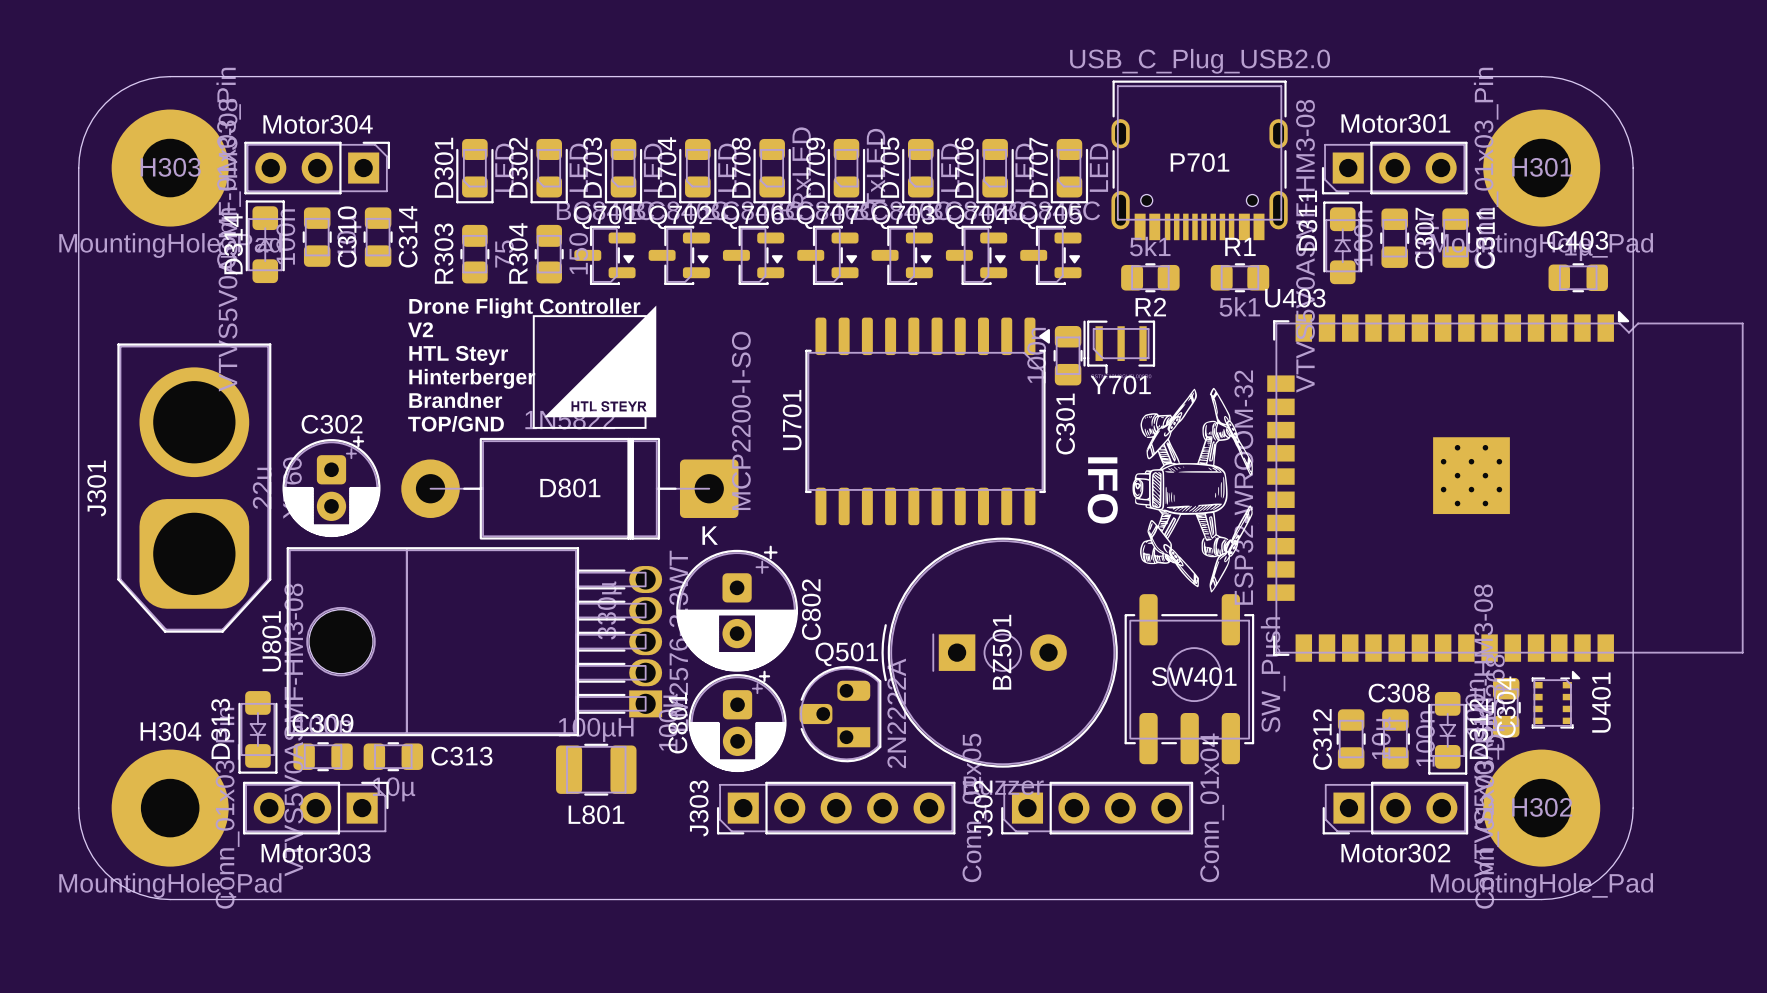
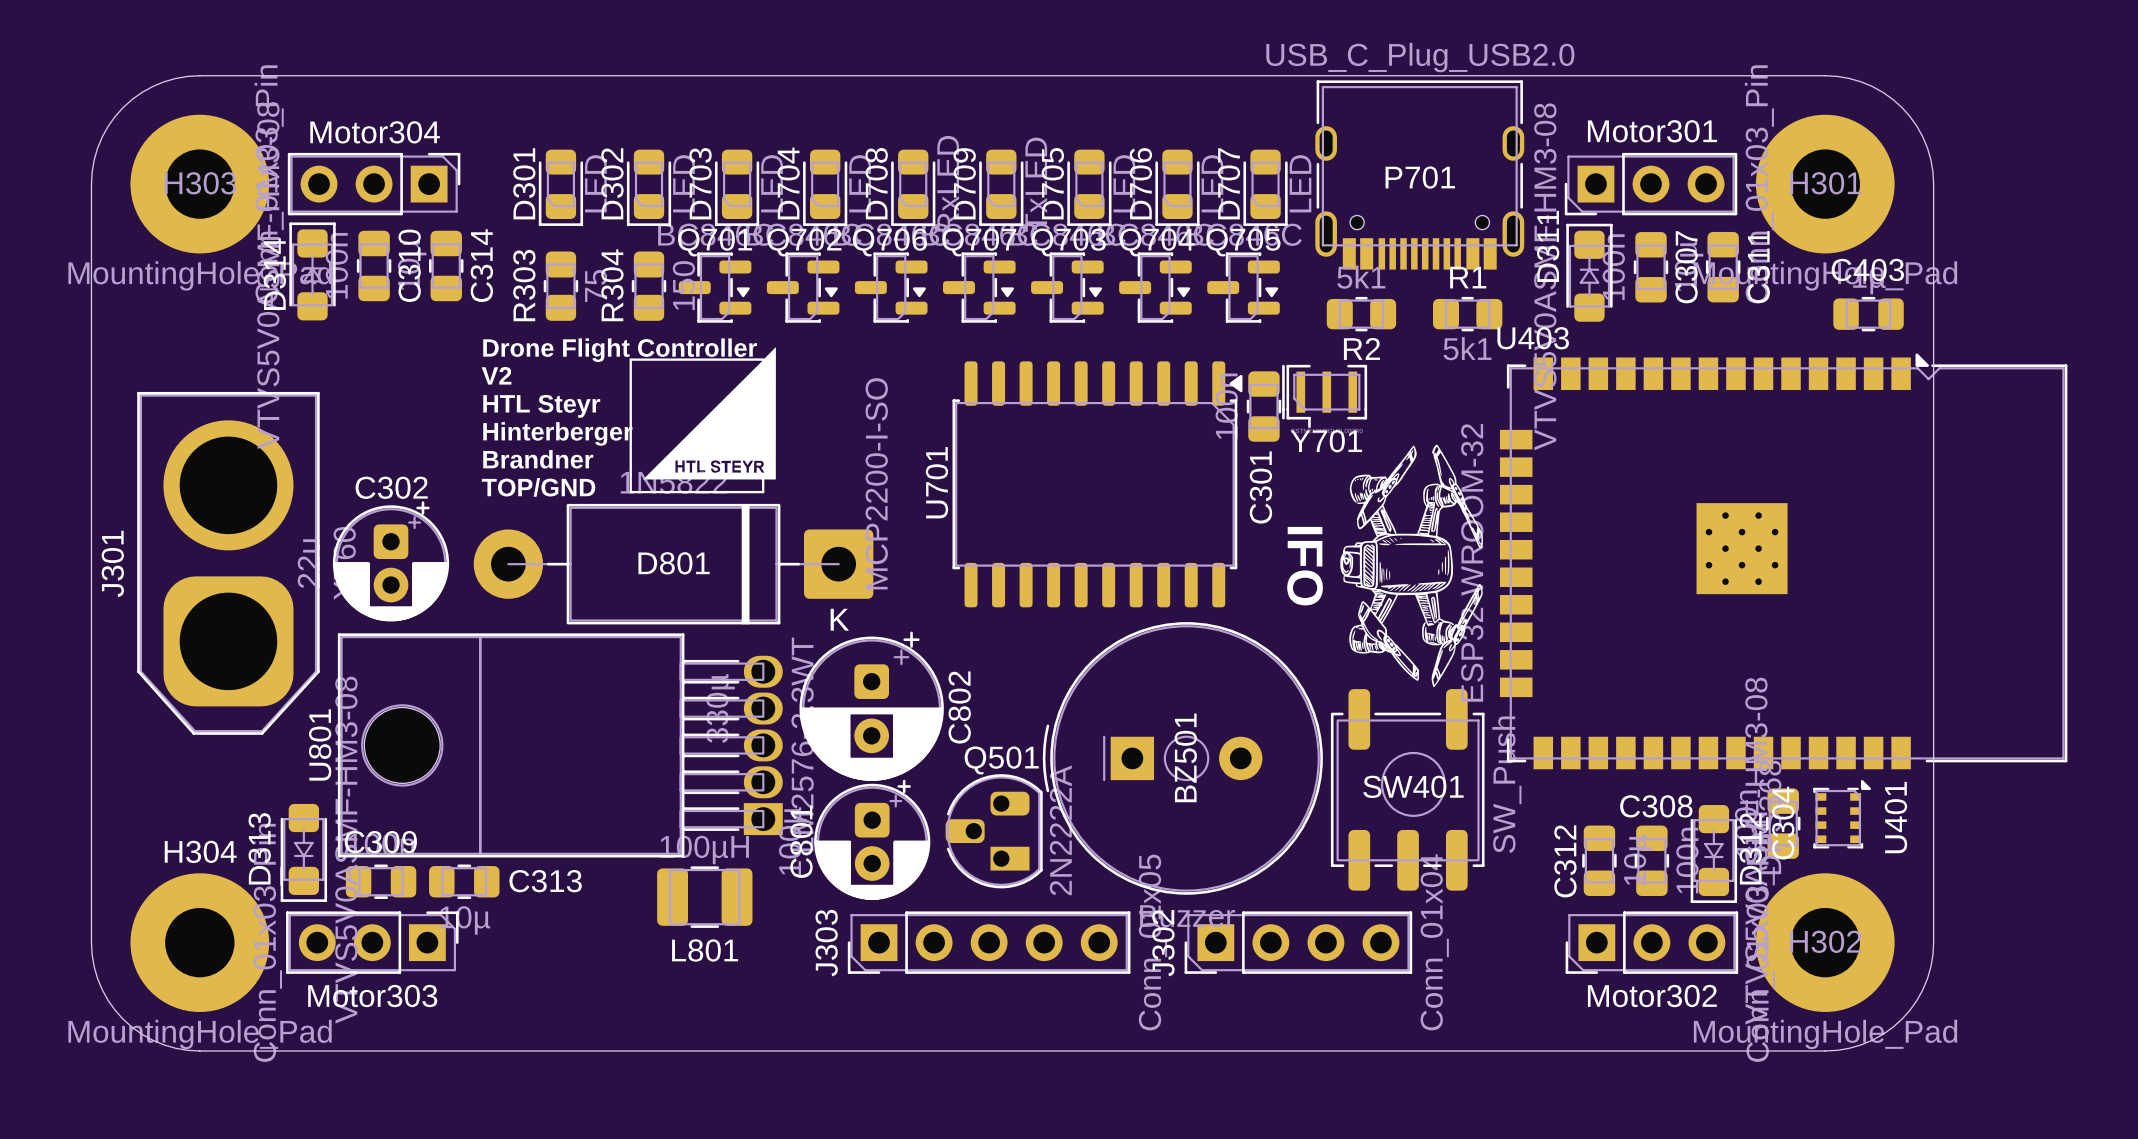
U403 footprint: [1267, 310, 1744, 662] -> [1499, 353, 2068, 770]

